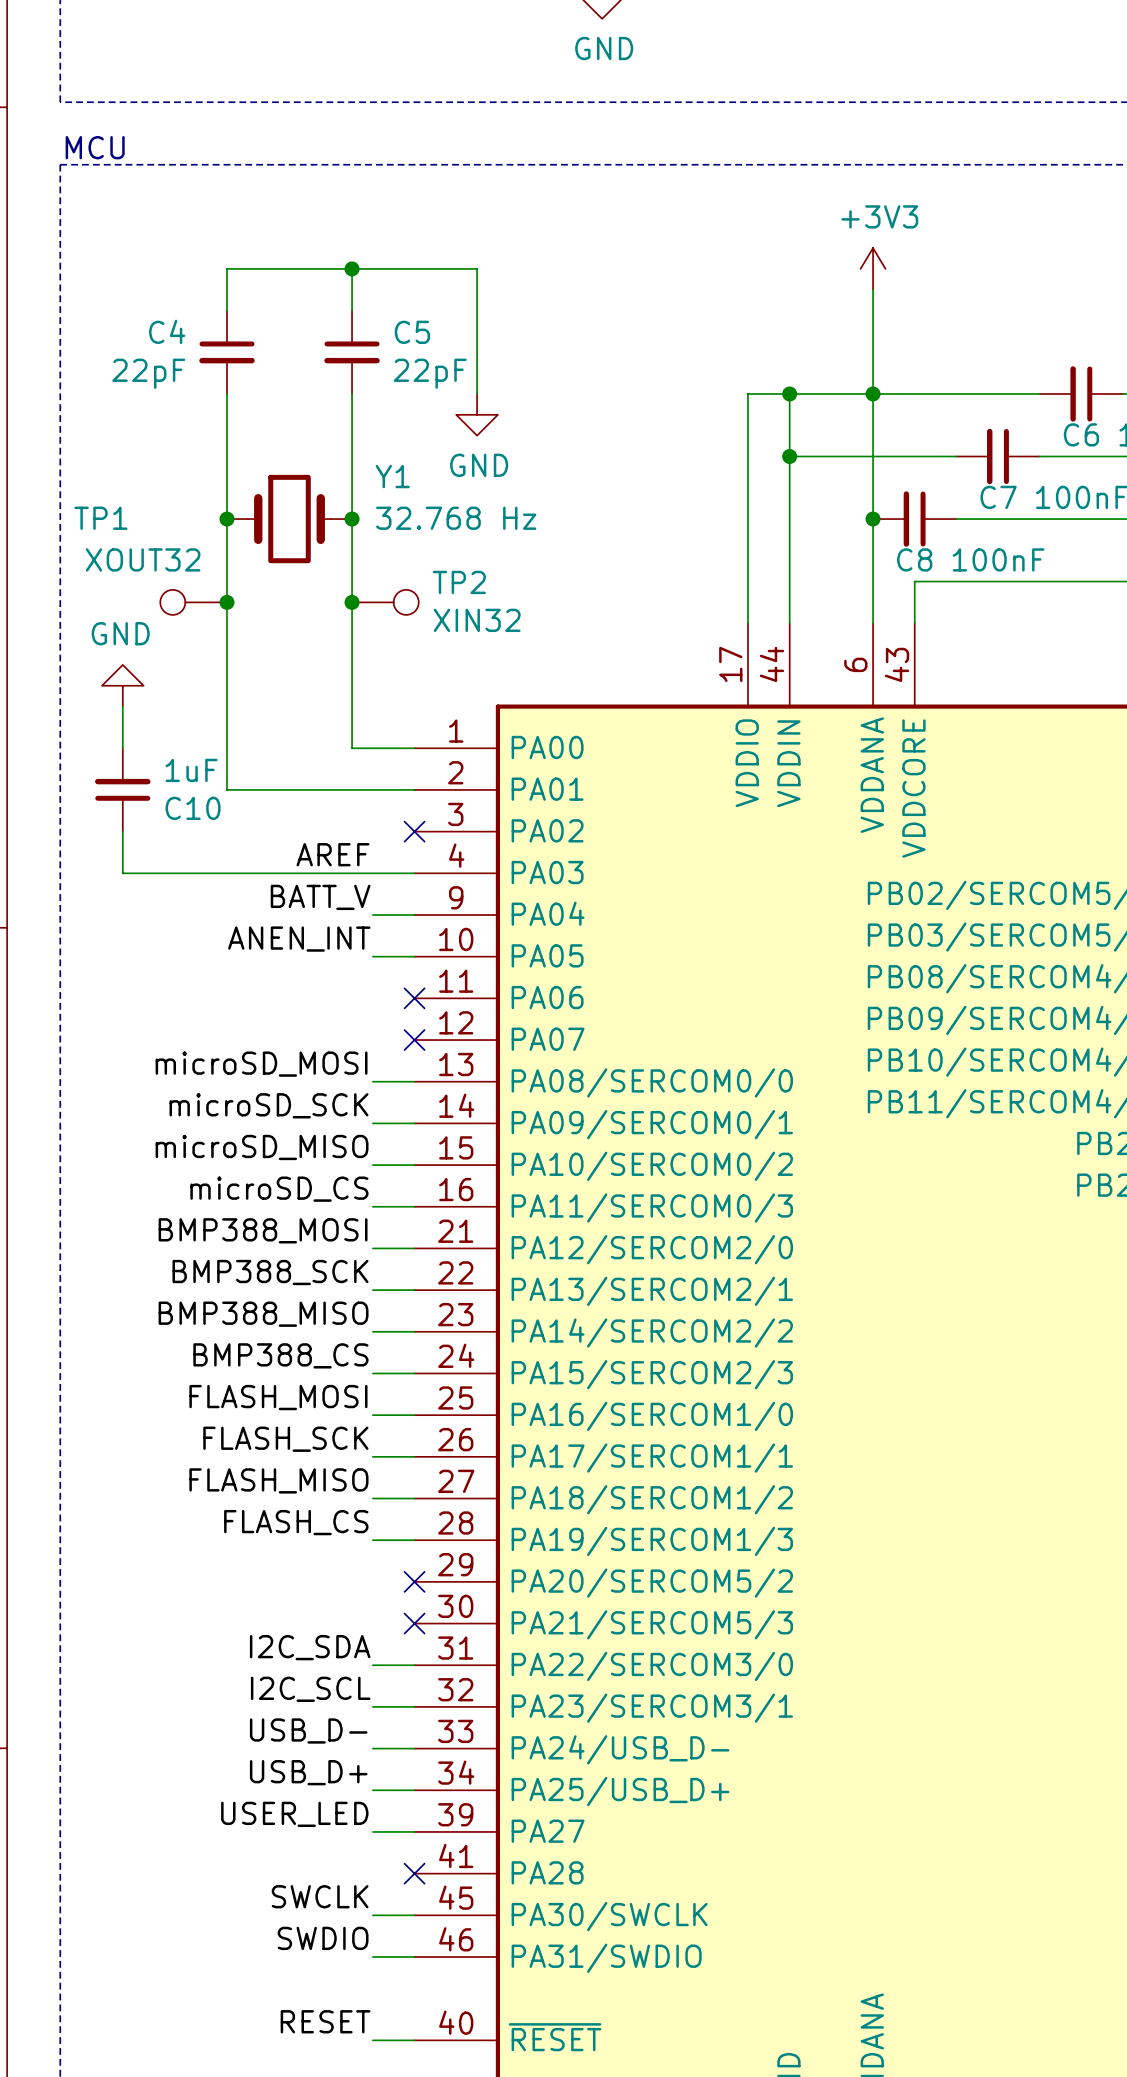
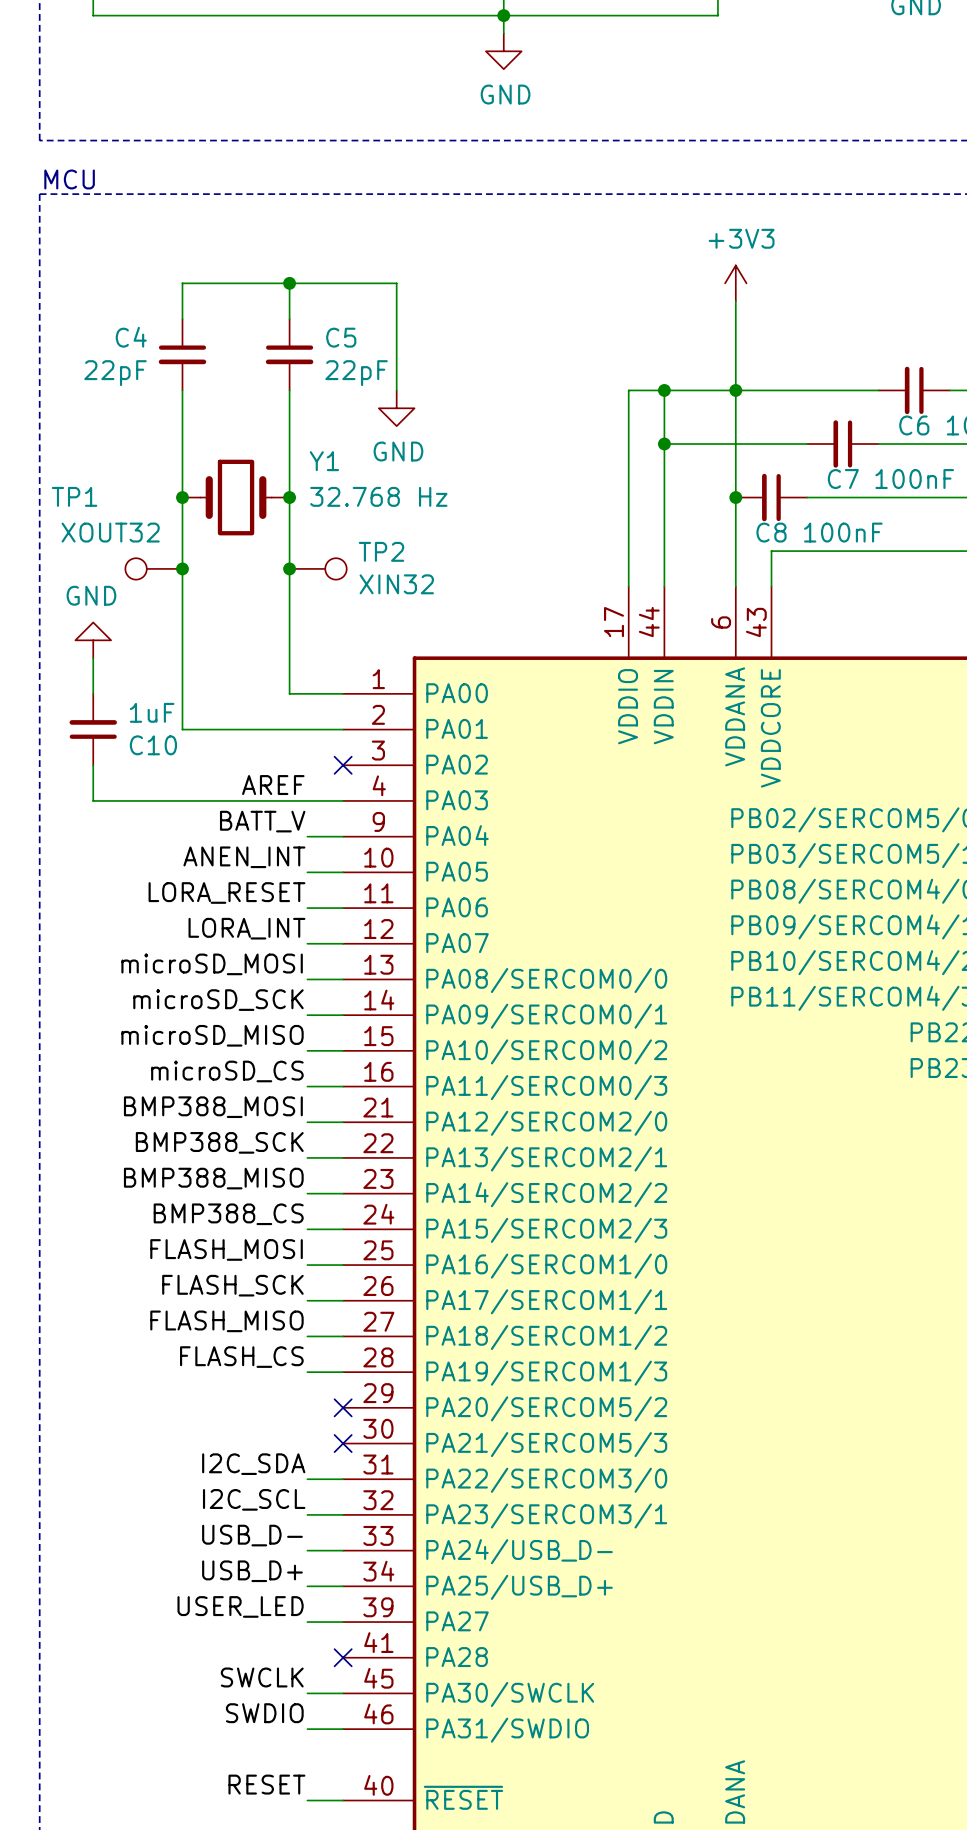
label: none -> LORA_RESET (226, 892)
wire: none -> (307, 908) (343, 908)
no-connect mark: (414, 998) -> none
label: none -> LORA_INT (246, 928)
wire: none -> (307, 943) (343, 943)
no-connect mark: (414, 1040) -> none

